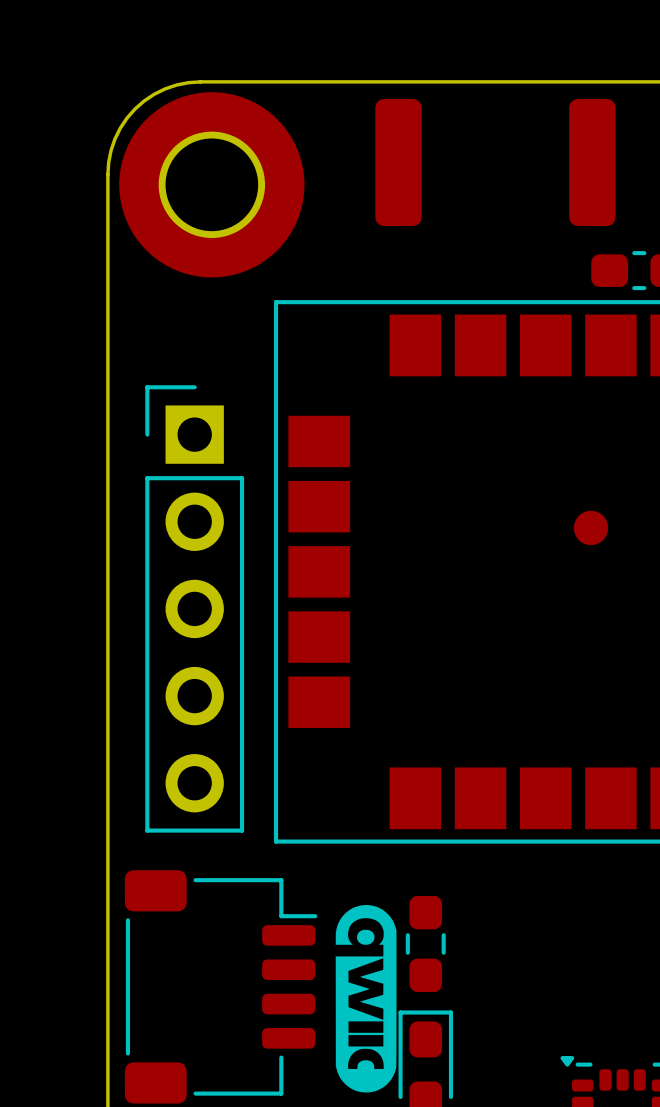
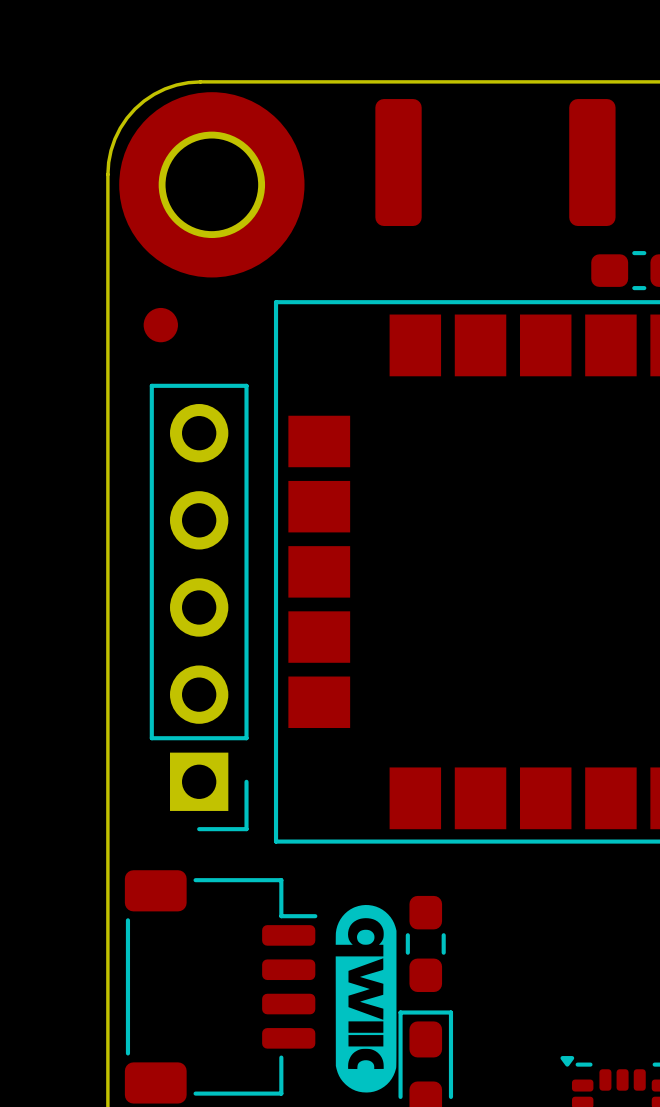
part position: (591, 527) -> (160, 325)
part rotation: 0° (194, 608) -> 180° (199, 607)

